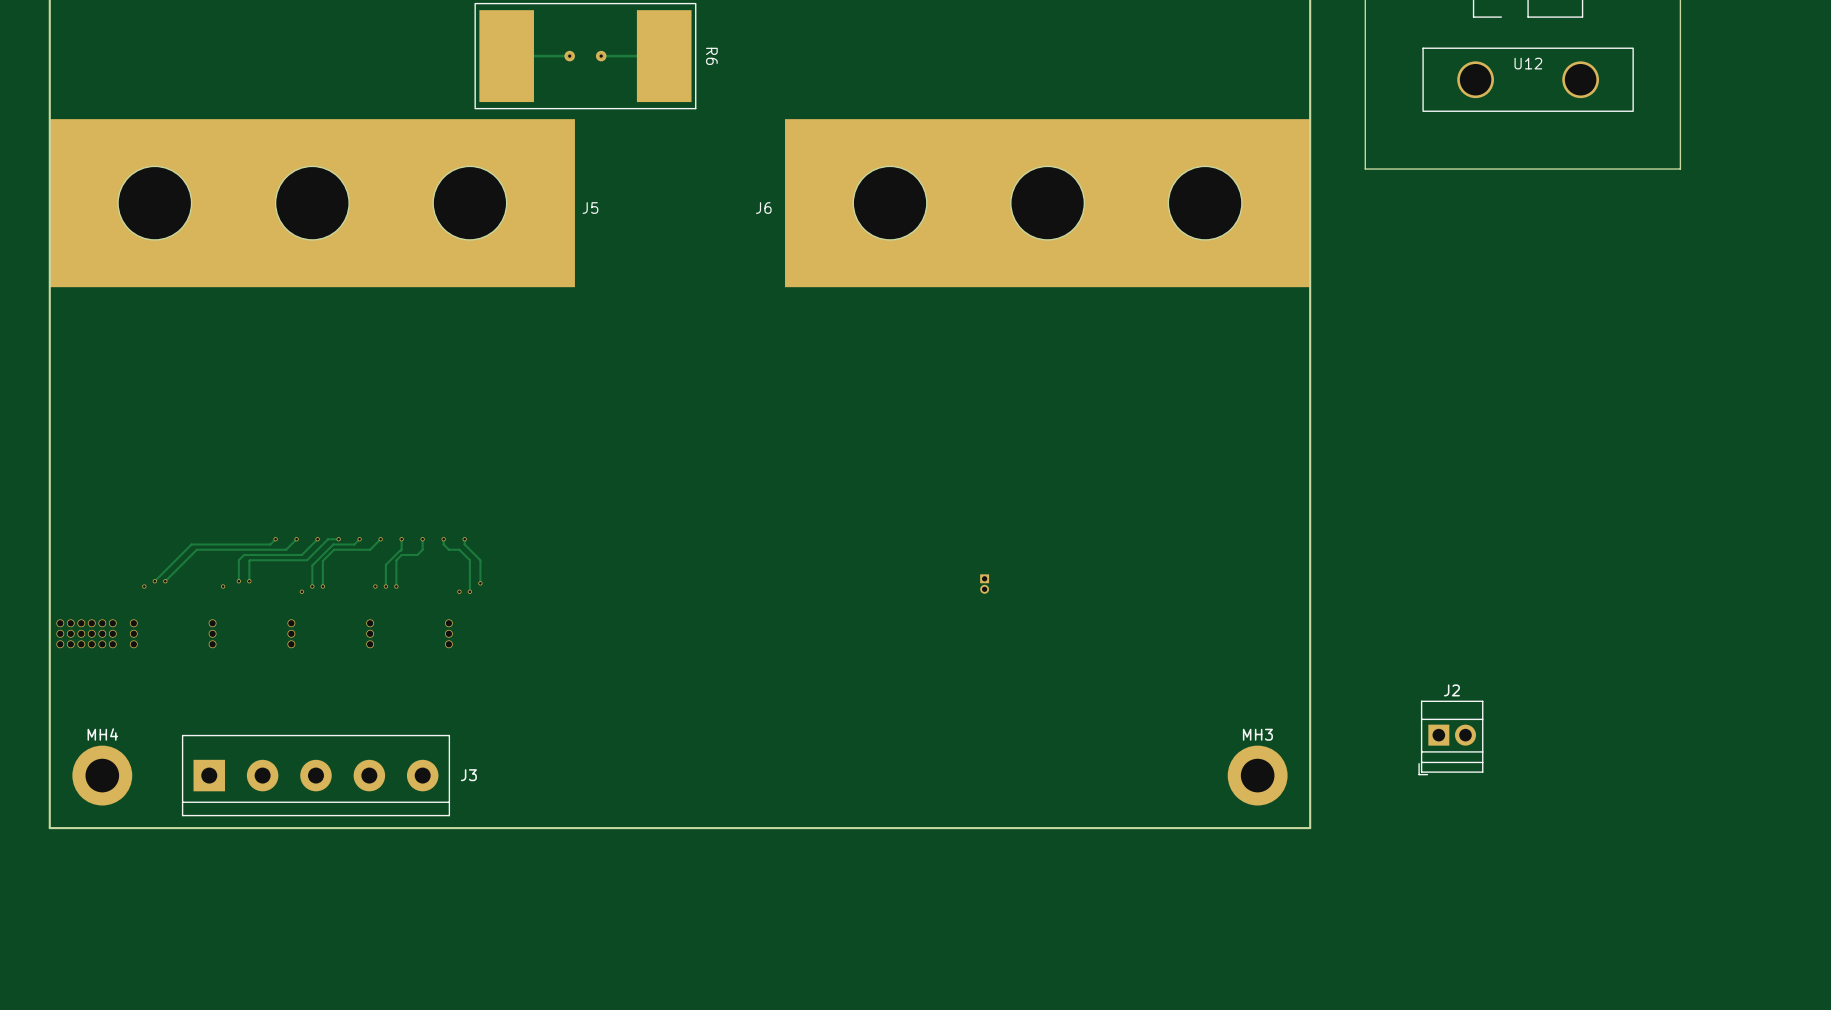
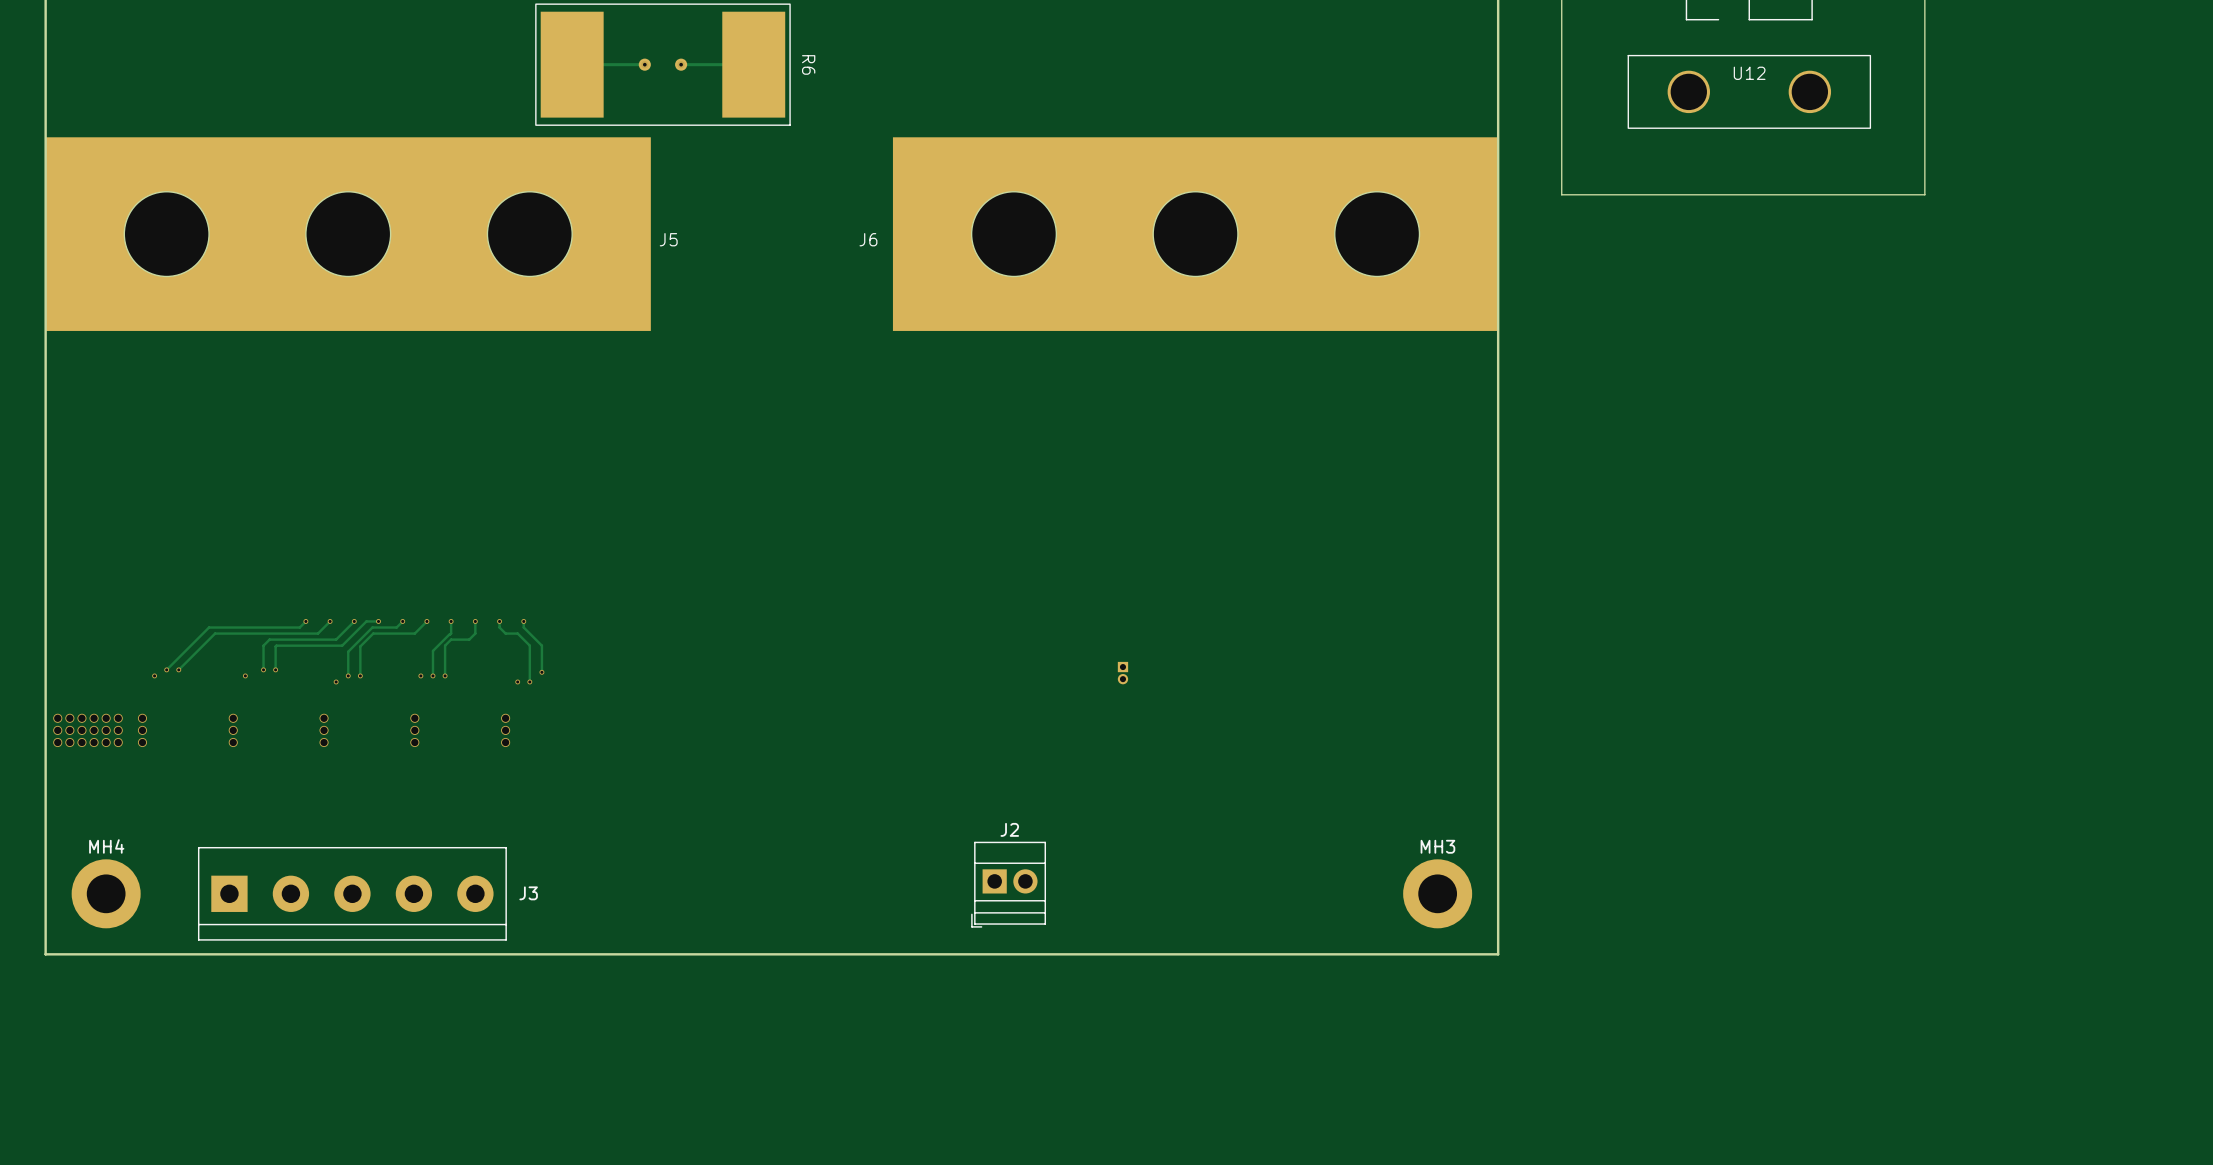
J2 position: (1450, 737) -> (1008, 884)

